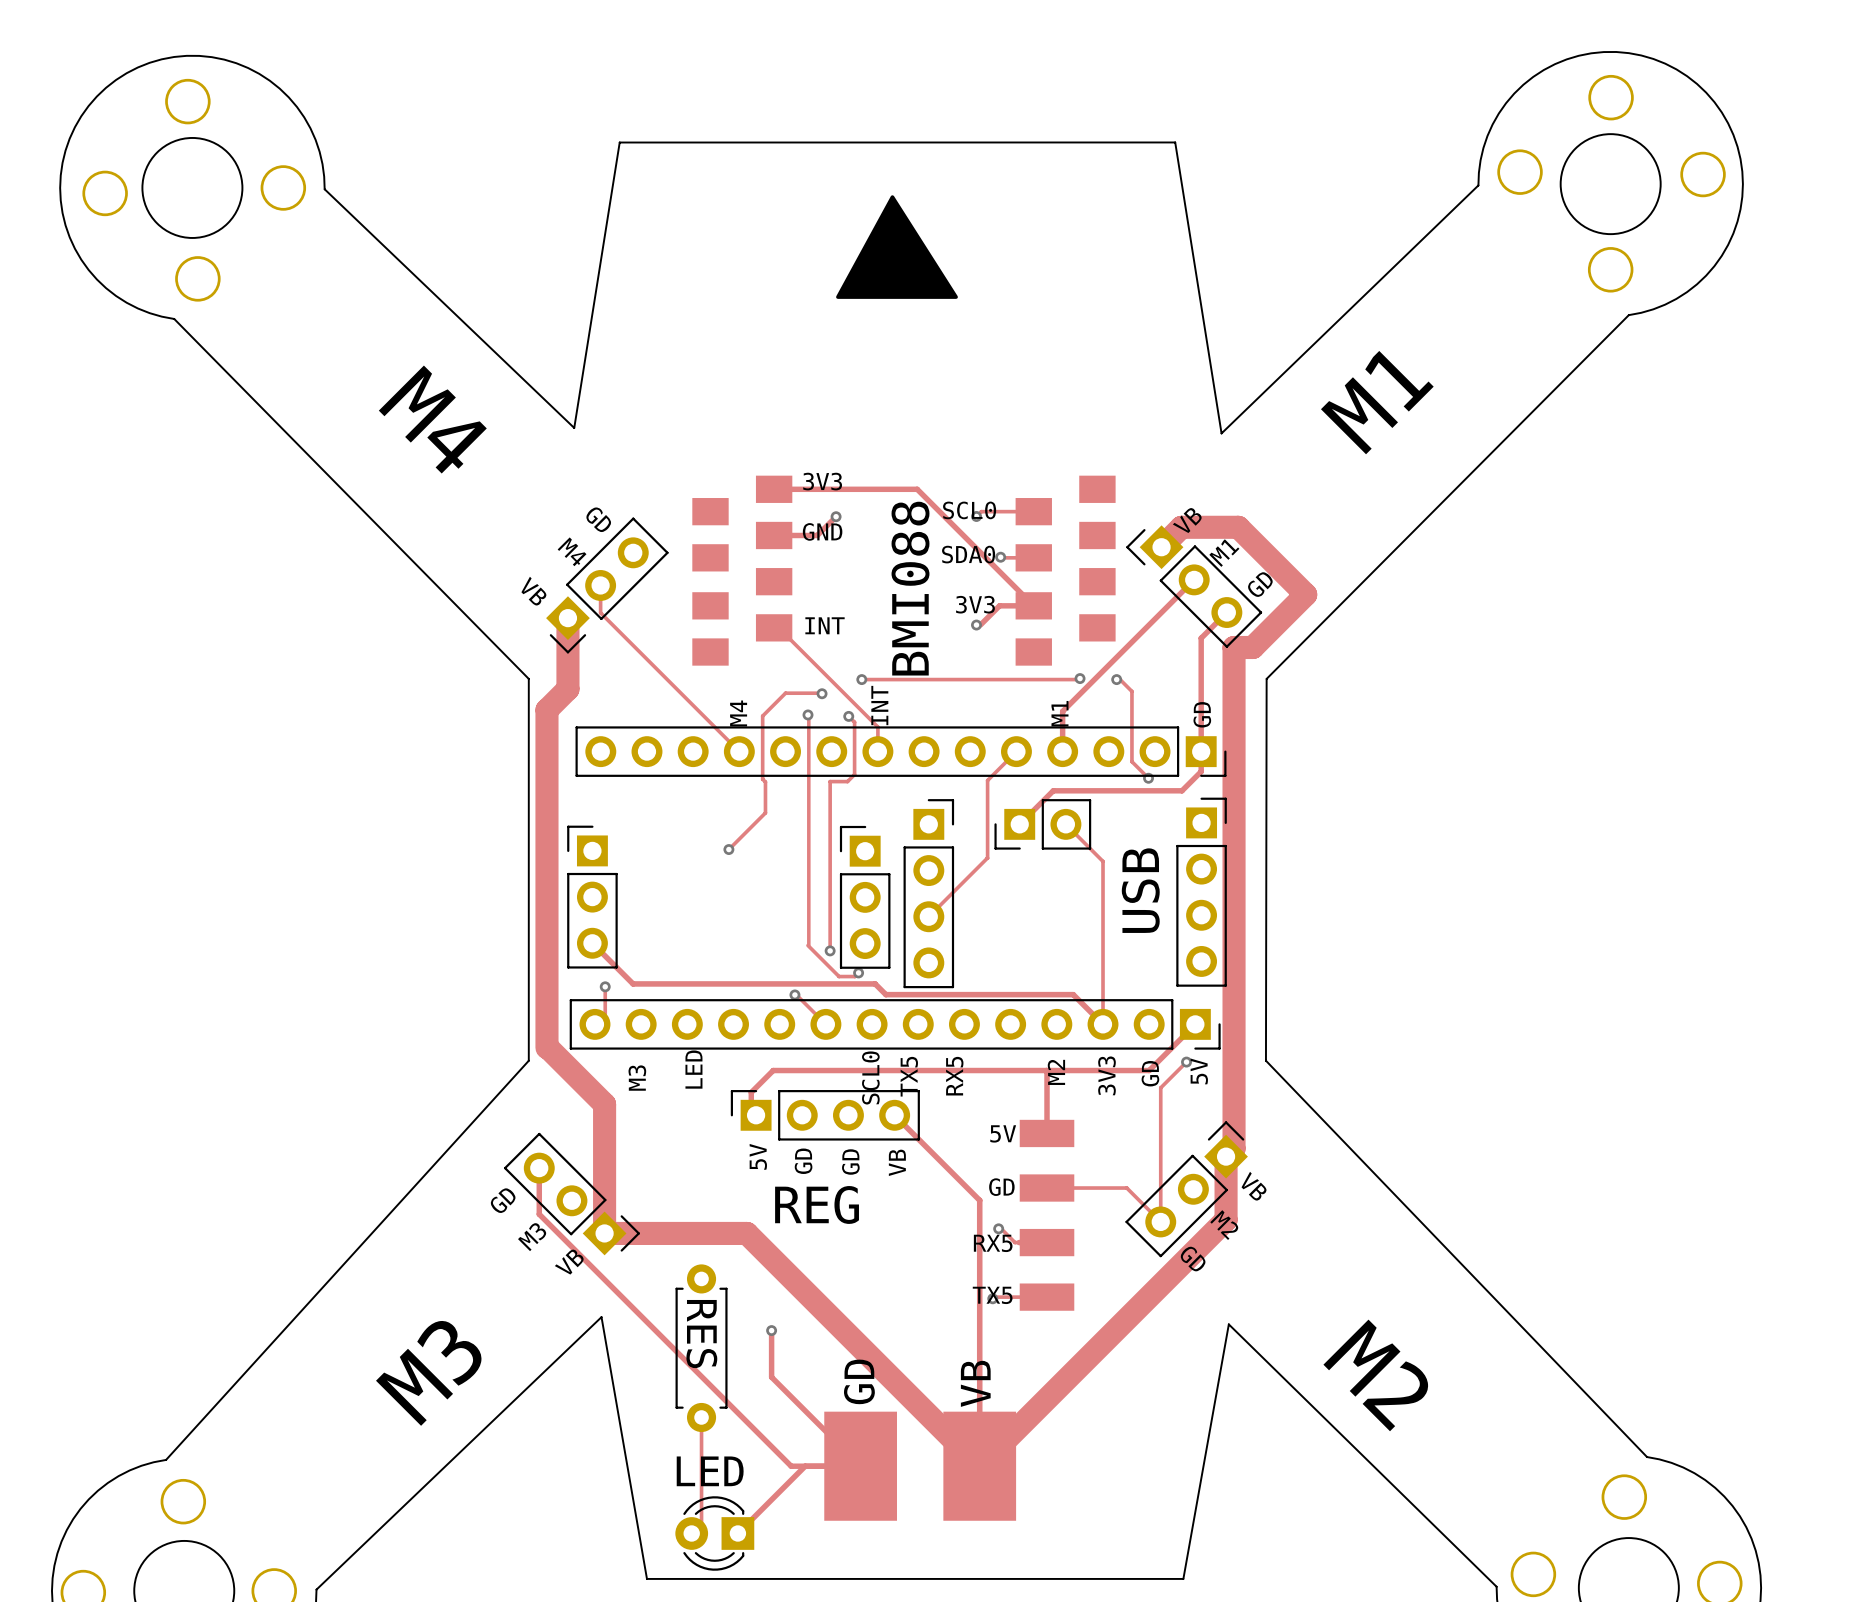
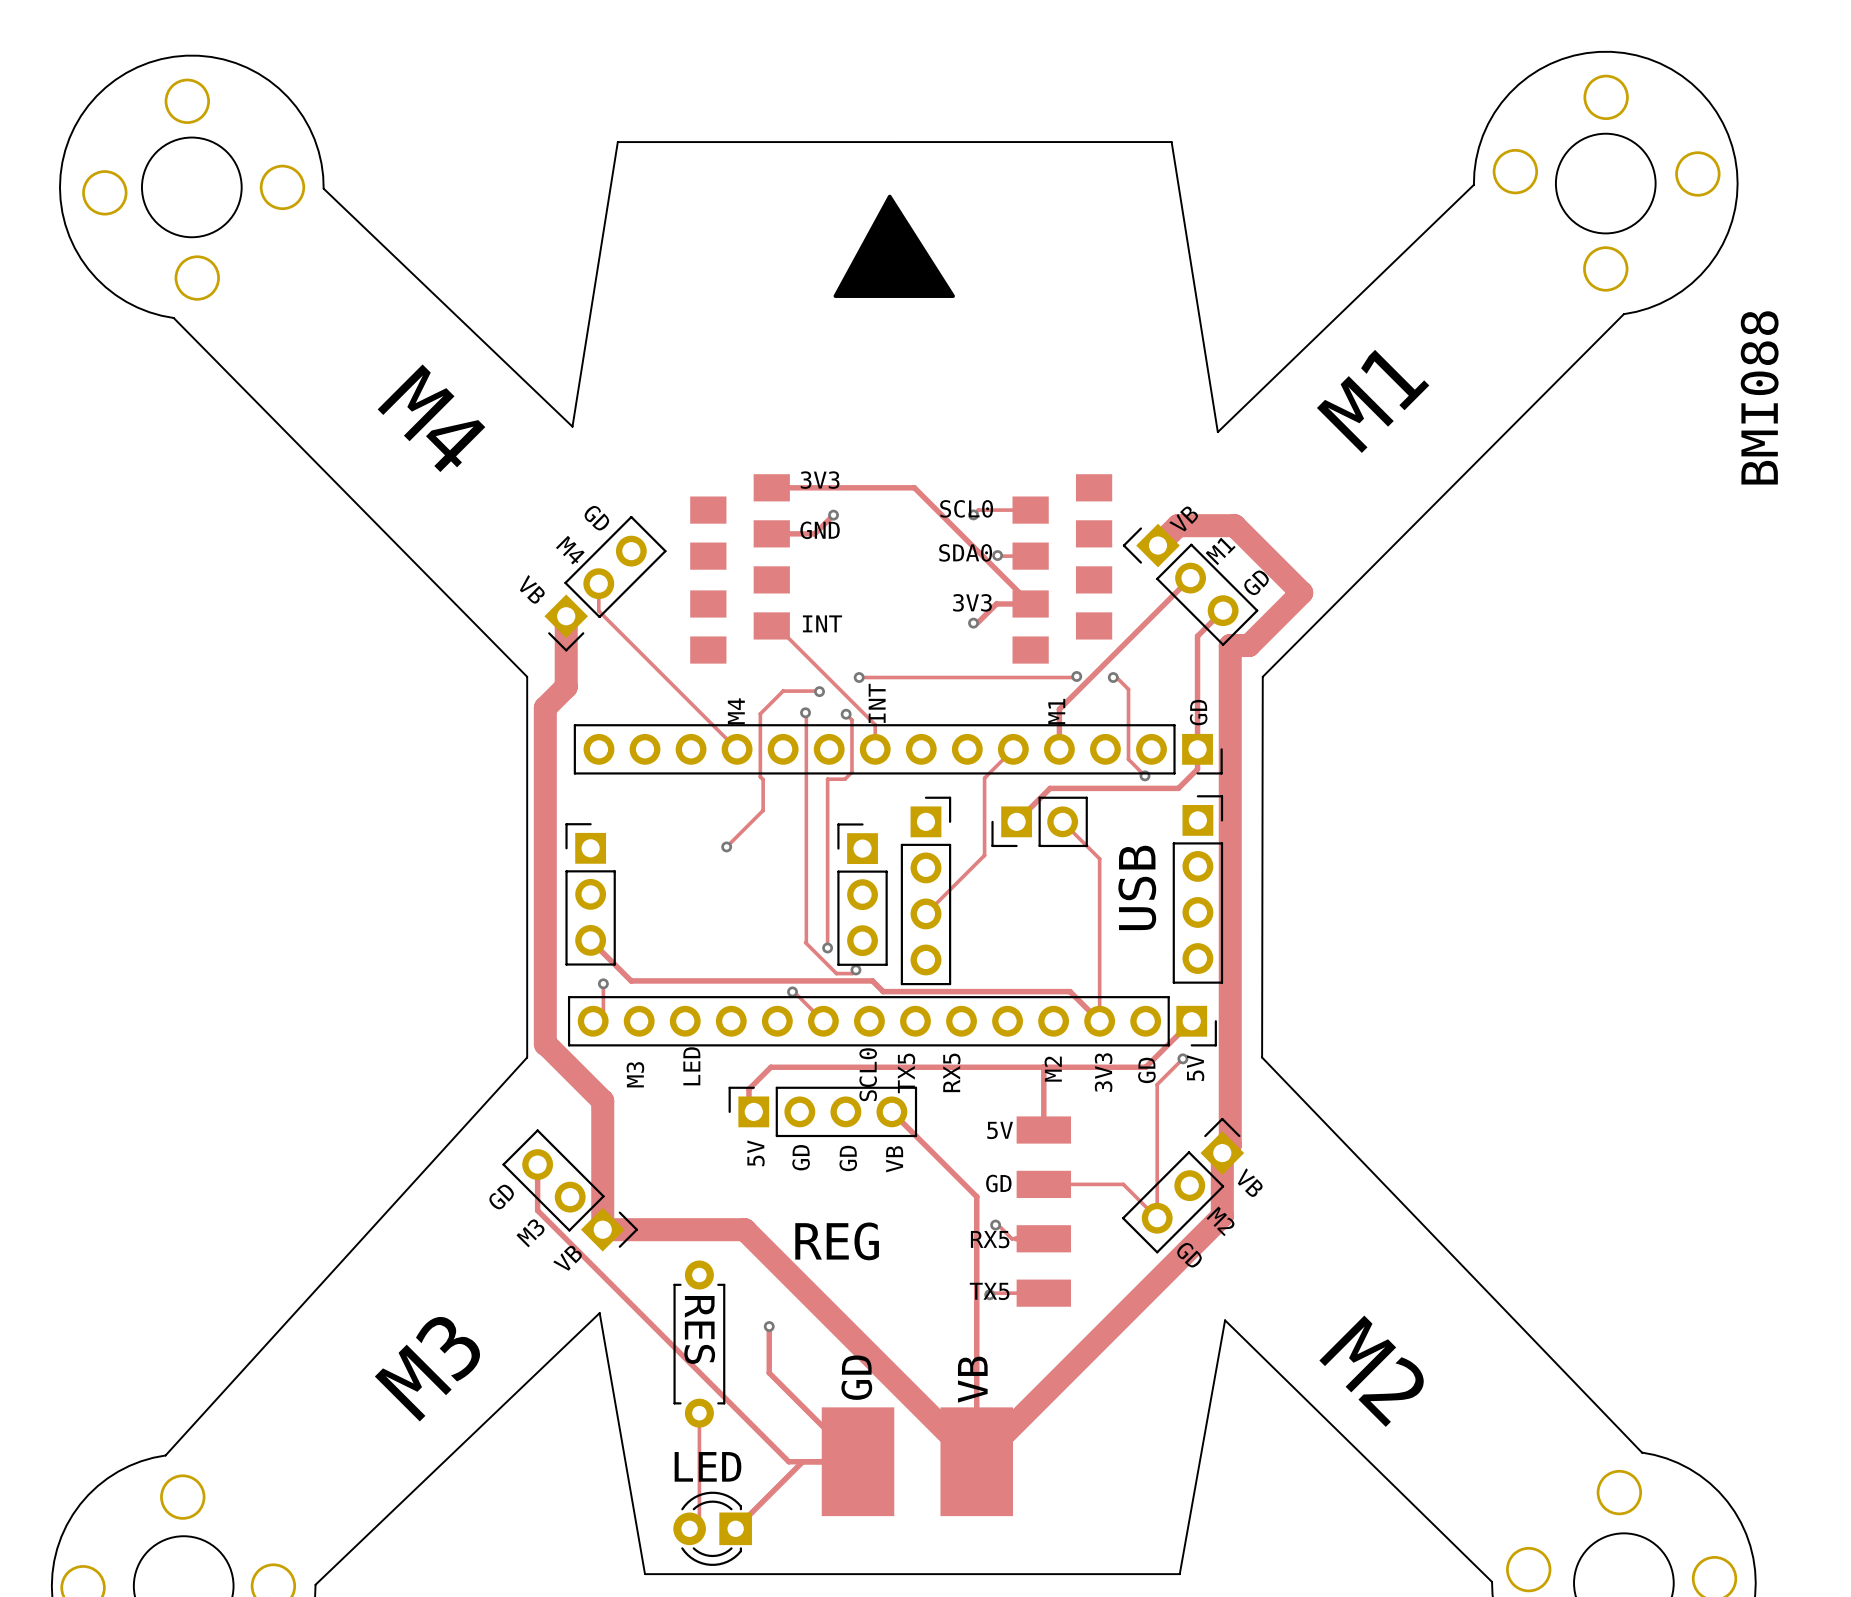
text: none -> BMI088 (1759, 397)
text: BMI088 (910, 588) -> none
text position: REG (817, 1204) -> REG (837, 1241)

